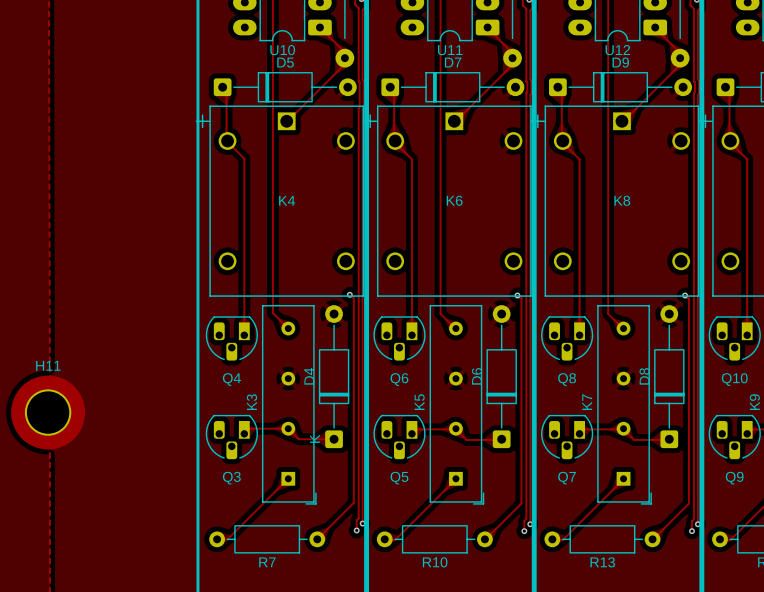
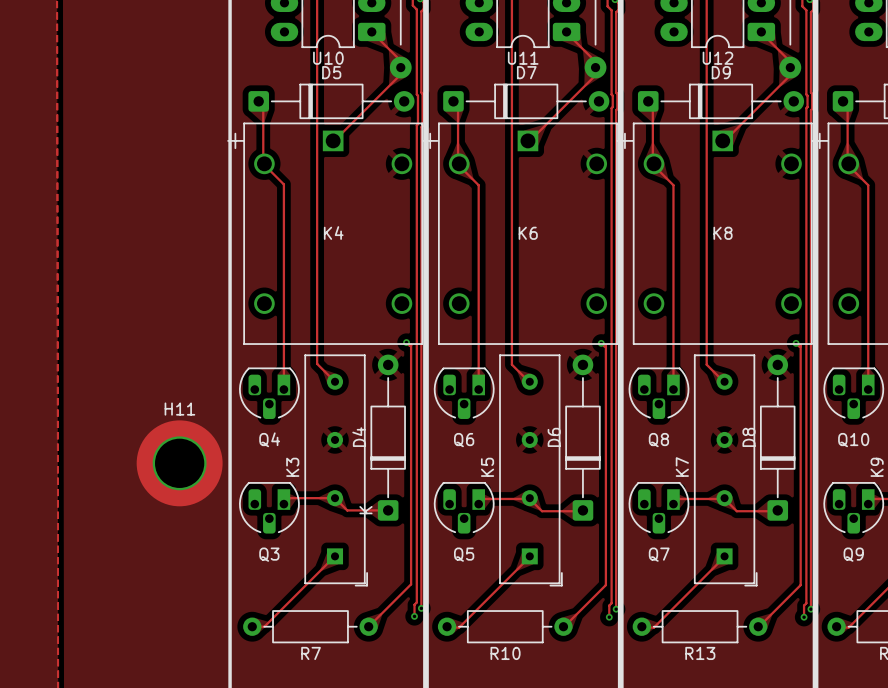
H11 position: (48, 412) -> (179, 463)

